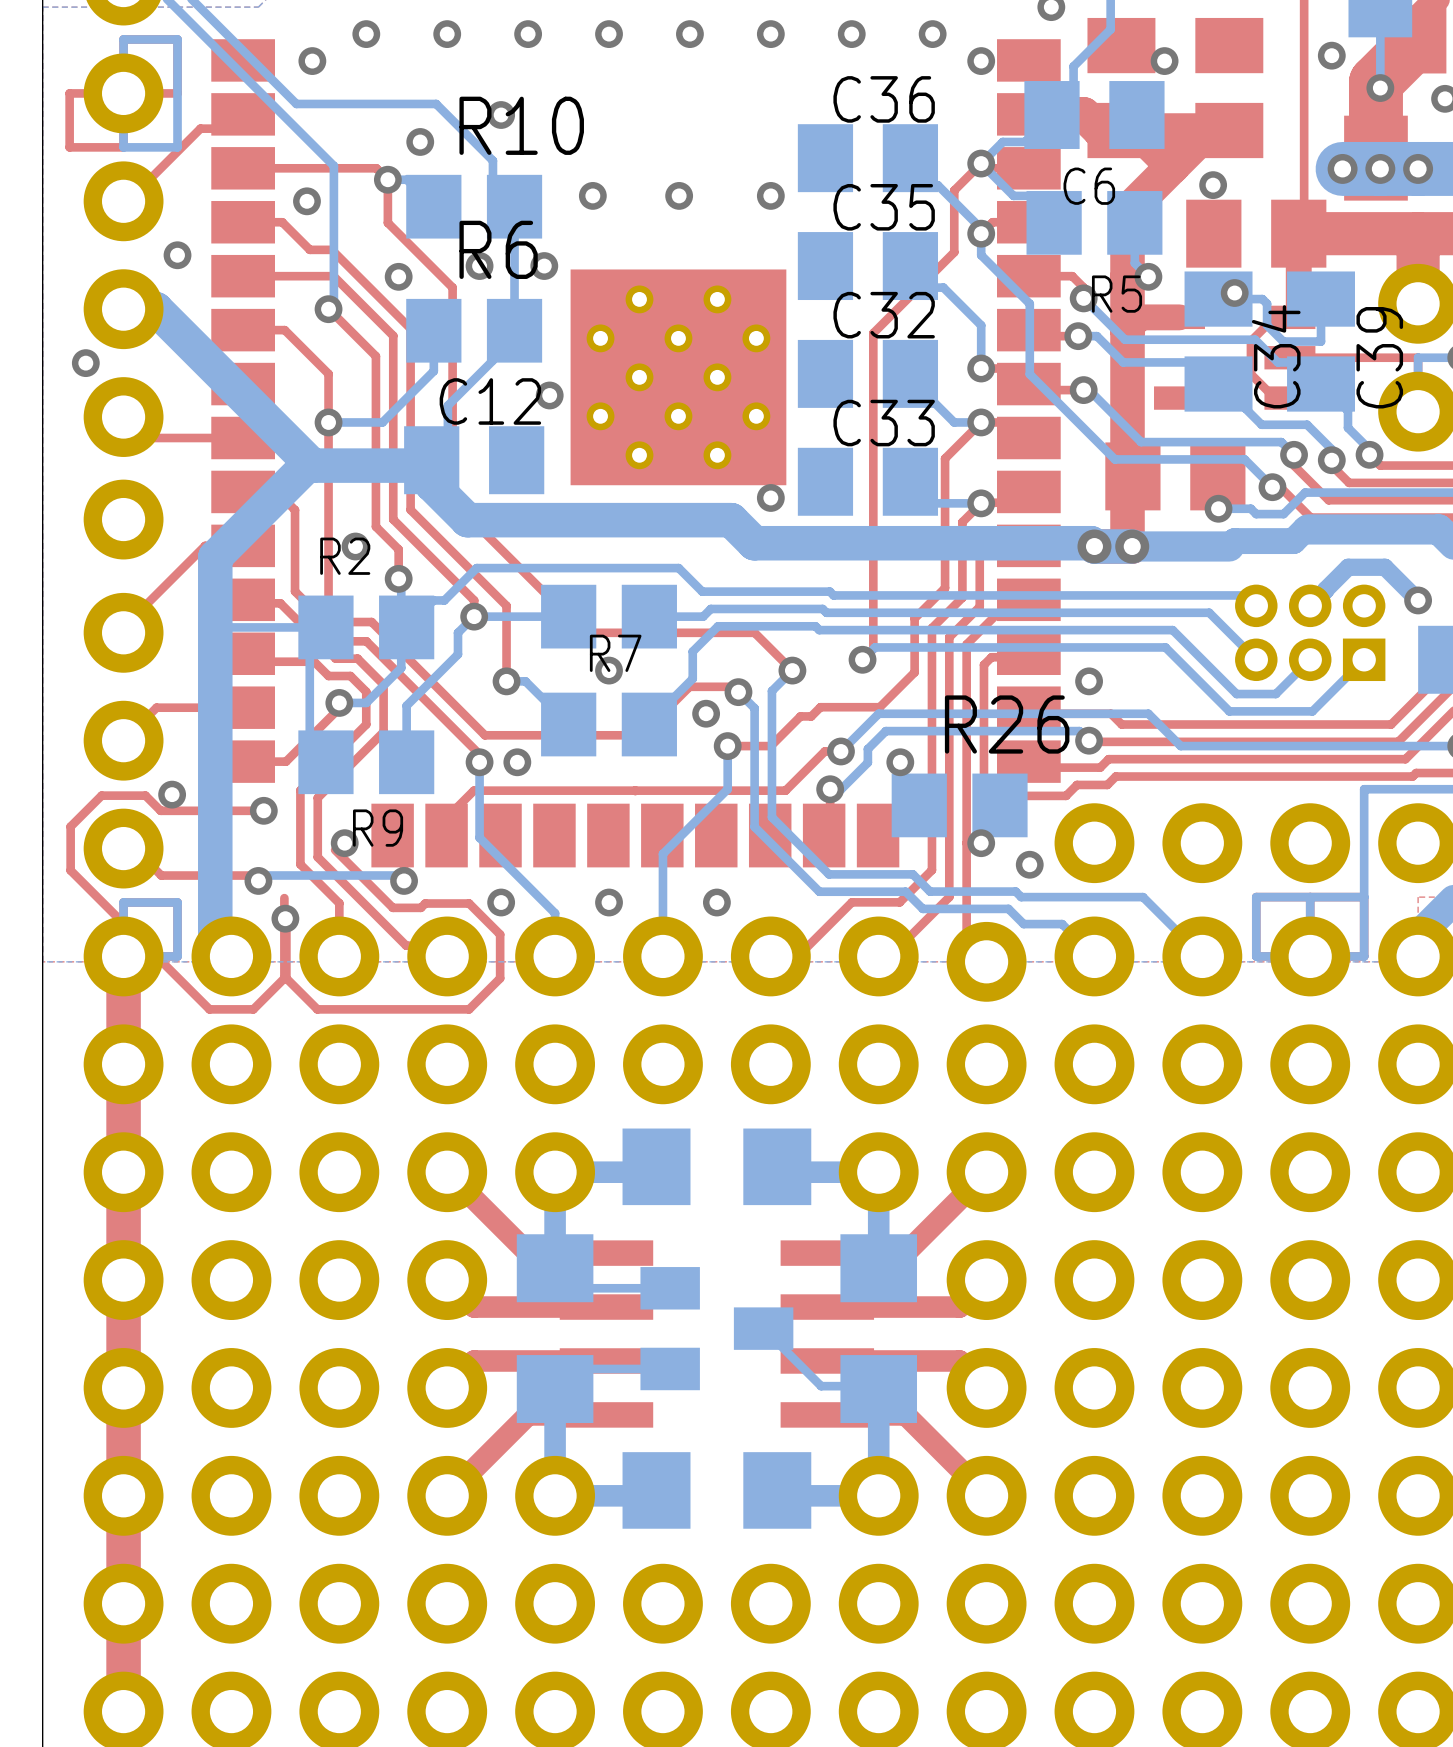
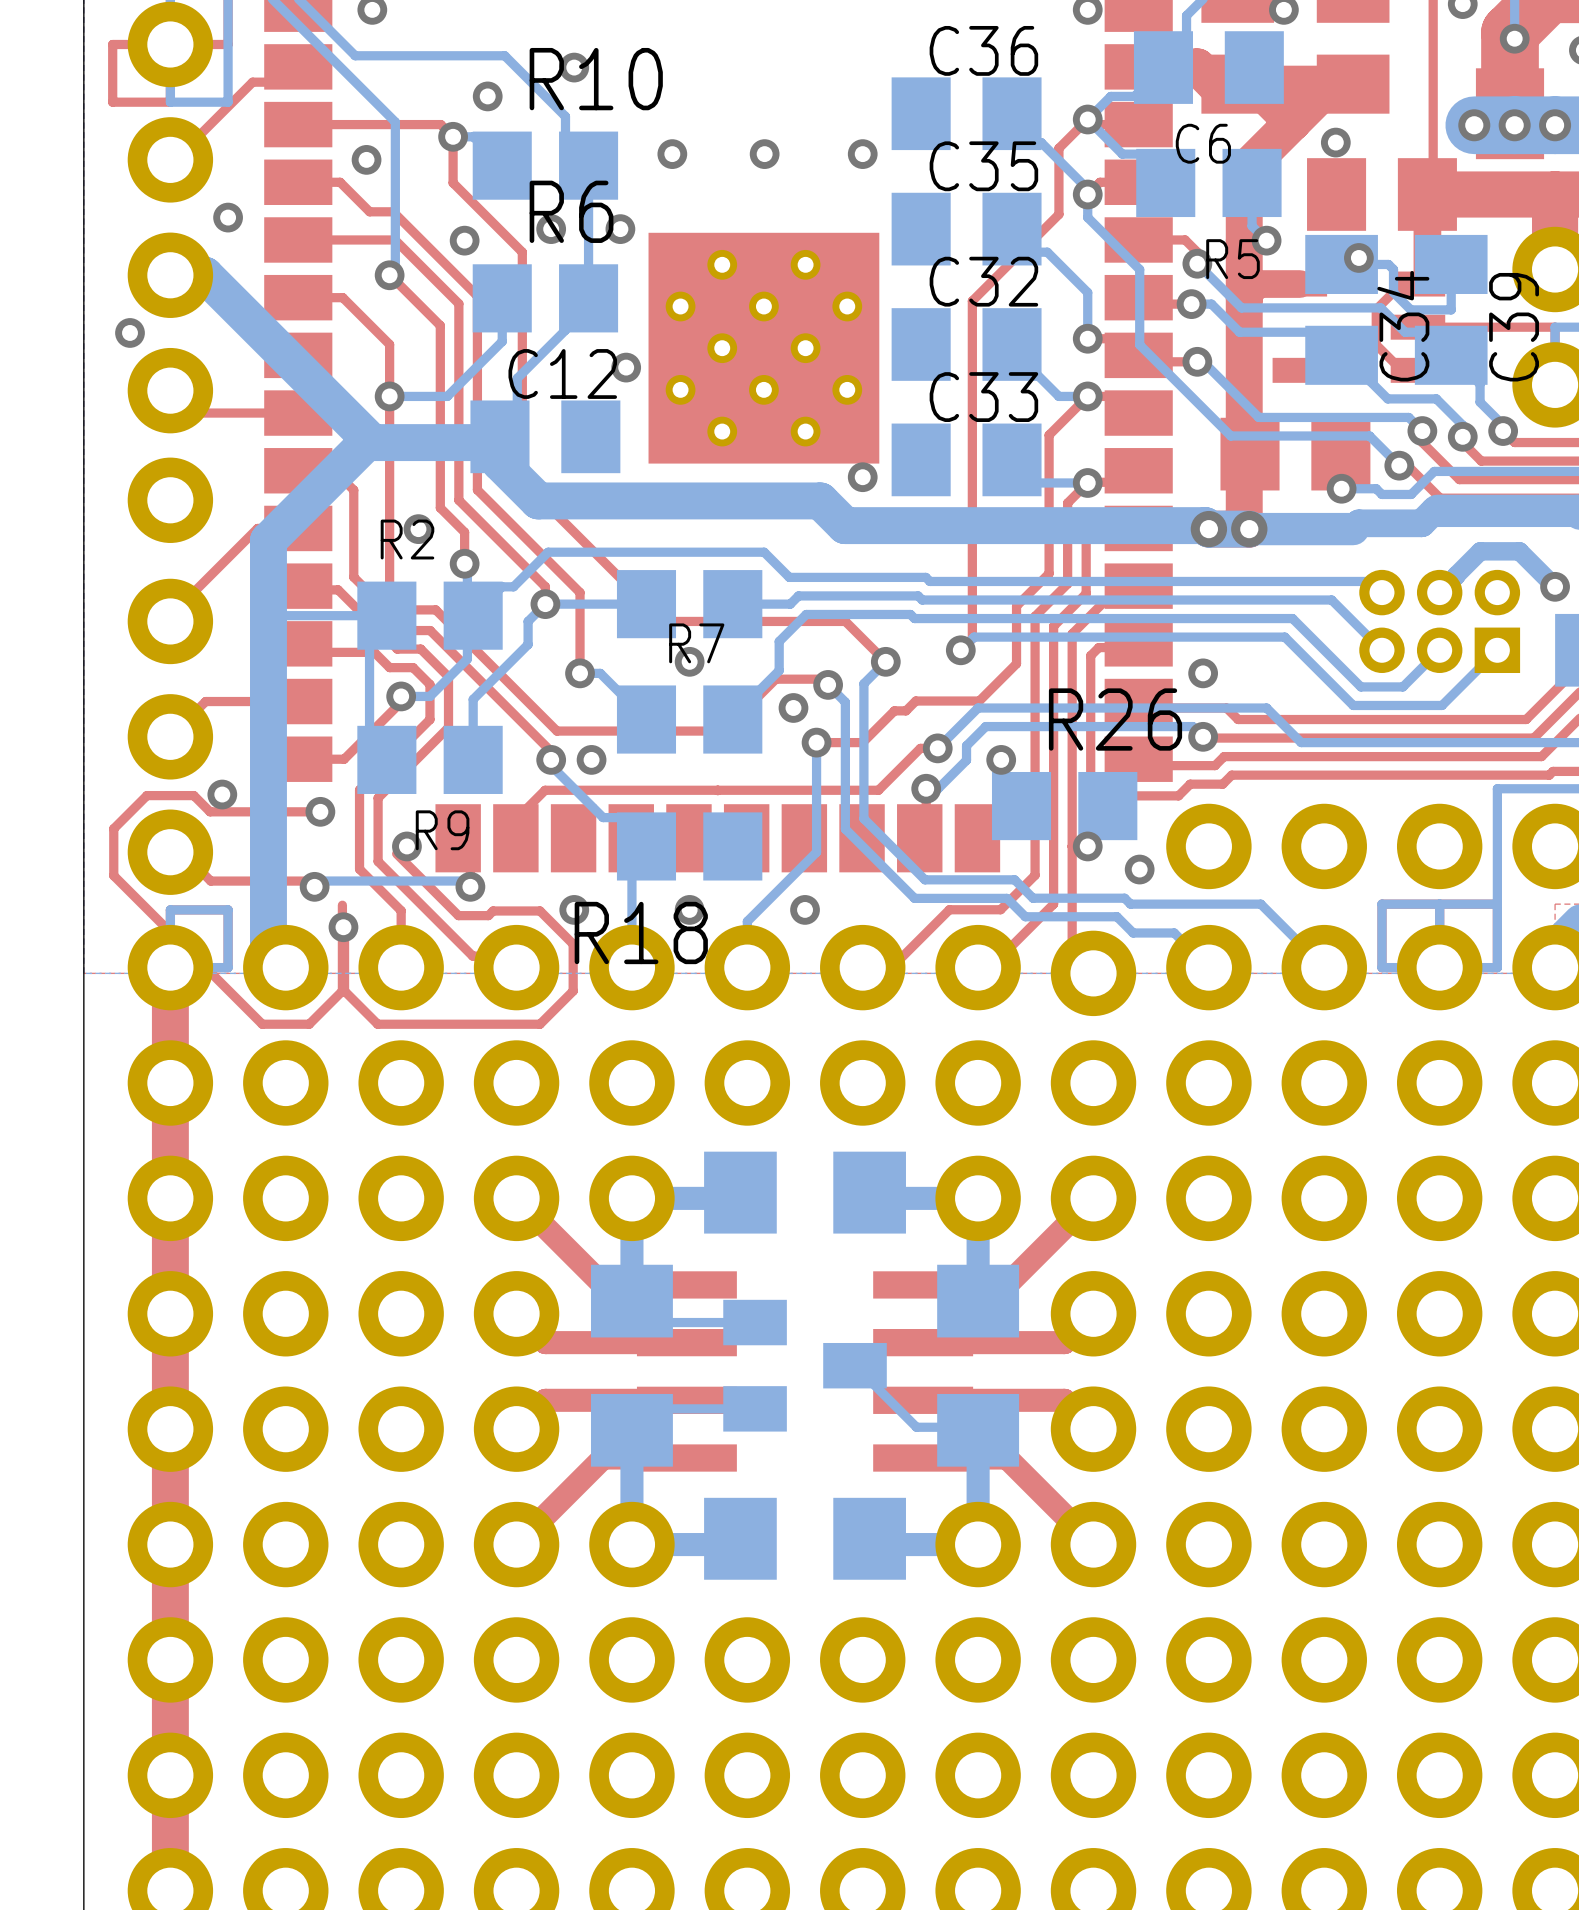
bottom track: (479, 767) (479, 837) (555, 913) -> (551, 765) (603, 817) (623, 817) (646, 840) (646, 846) (631, 860) (631, 921)
bottom track: (727, 789) (662, 853) (662, 913) -> (816, 788) (816, 852) (747, 921)
R18: none -> (689, 846)

